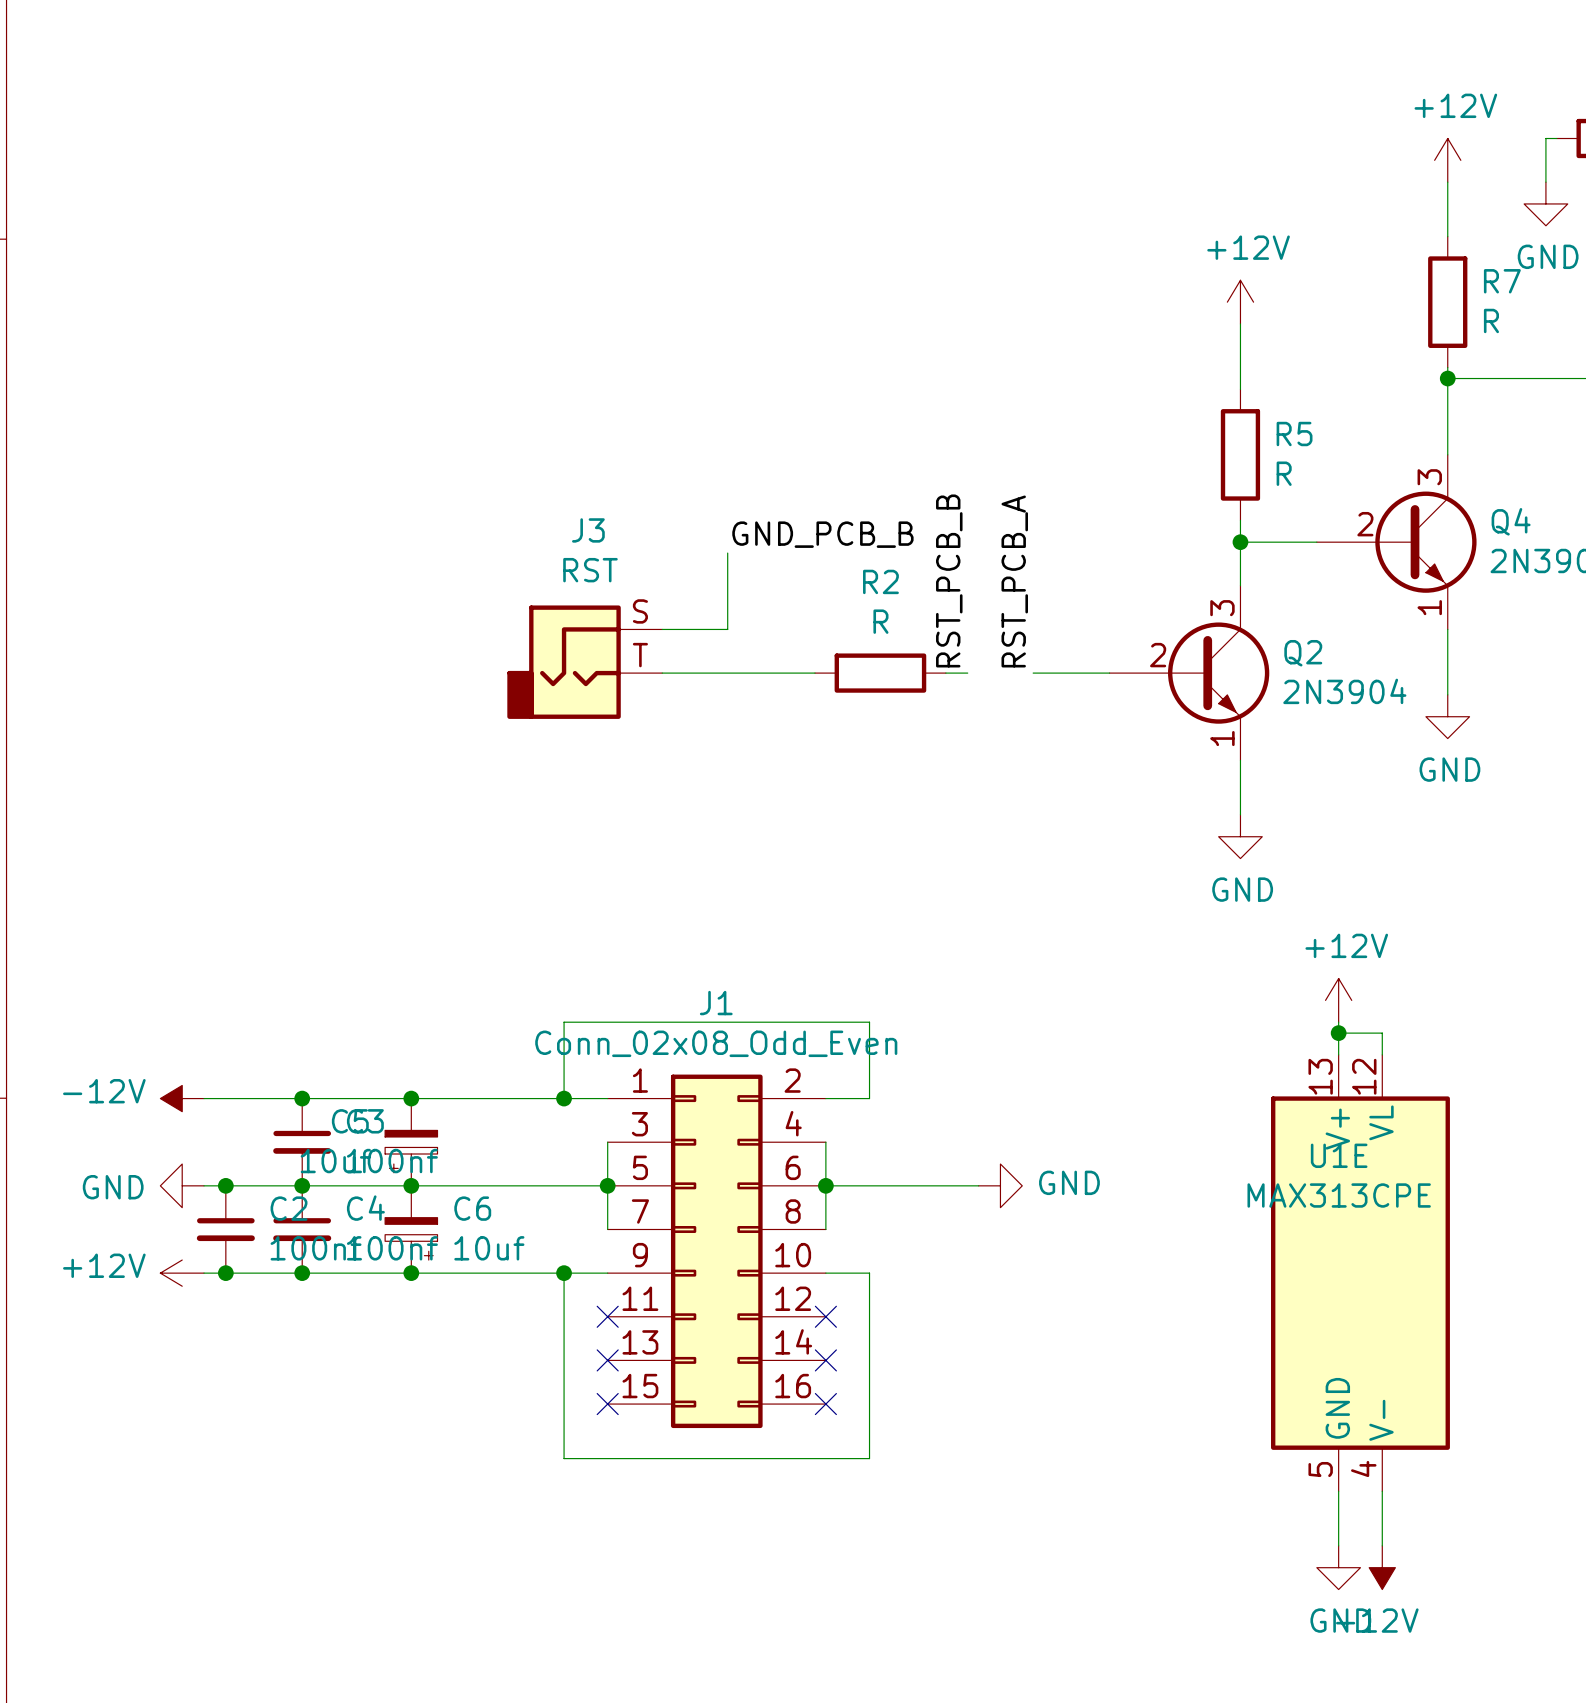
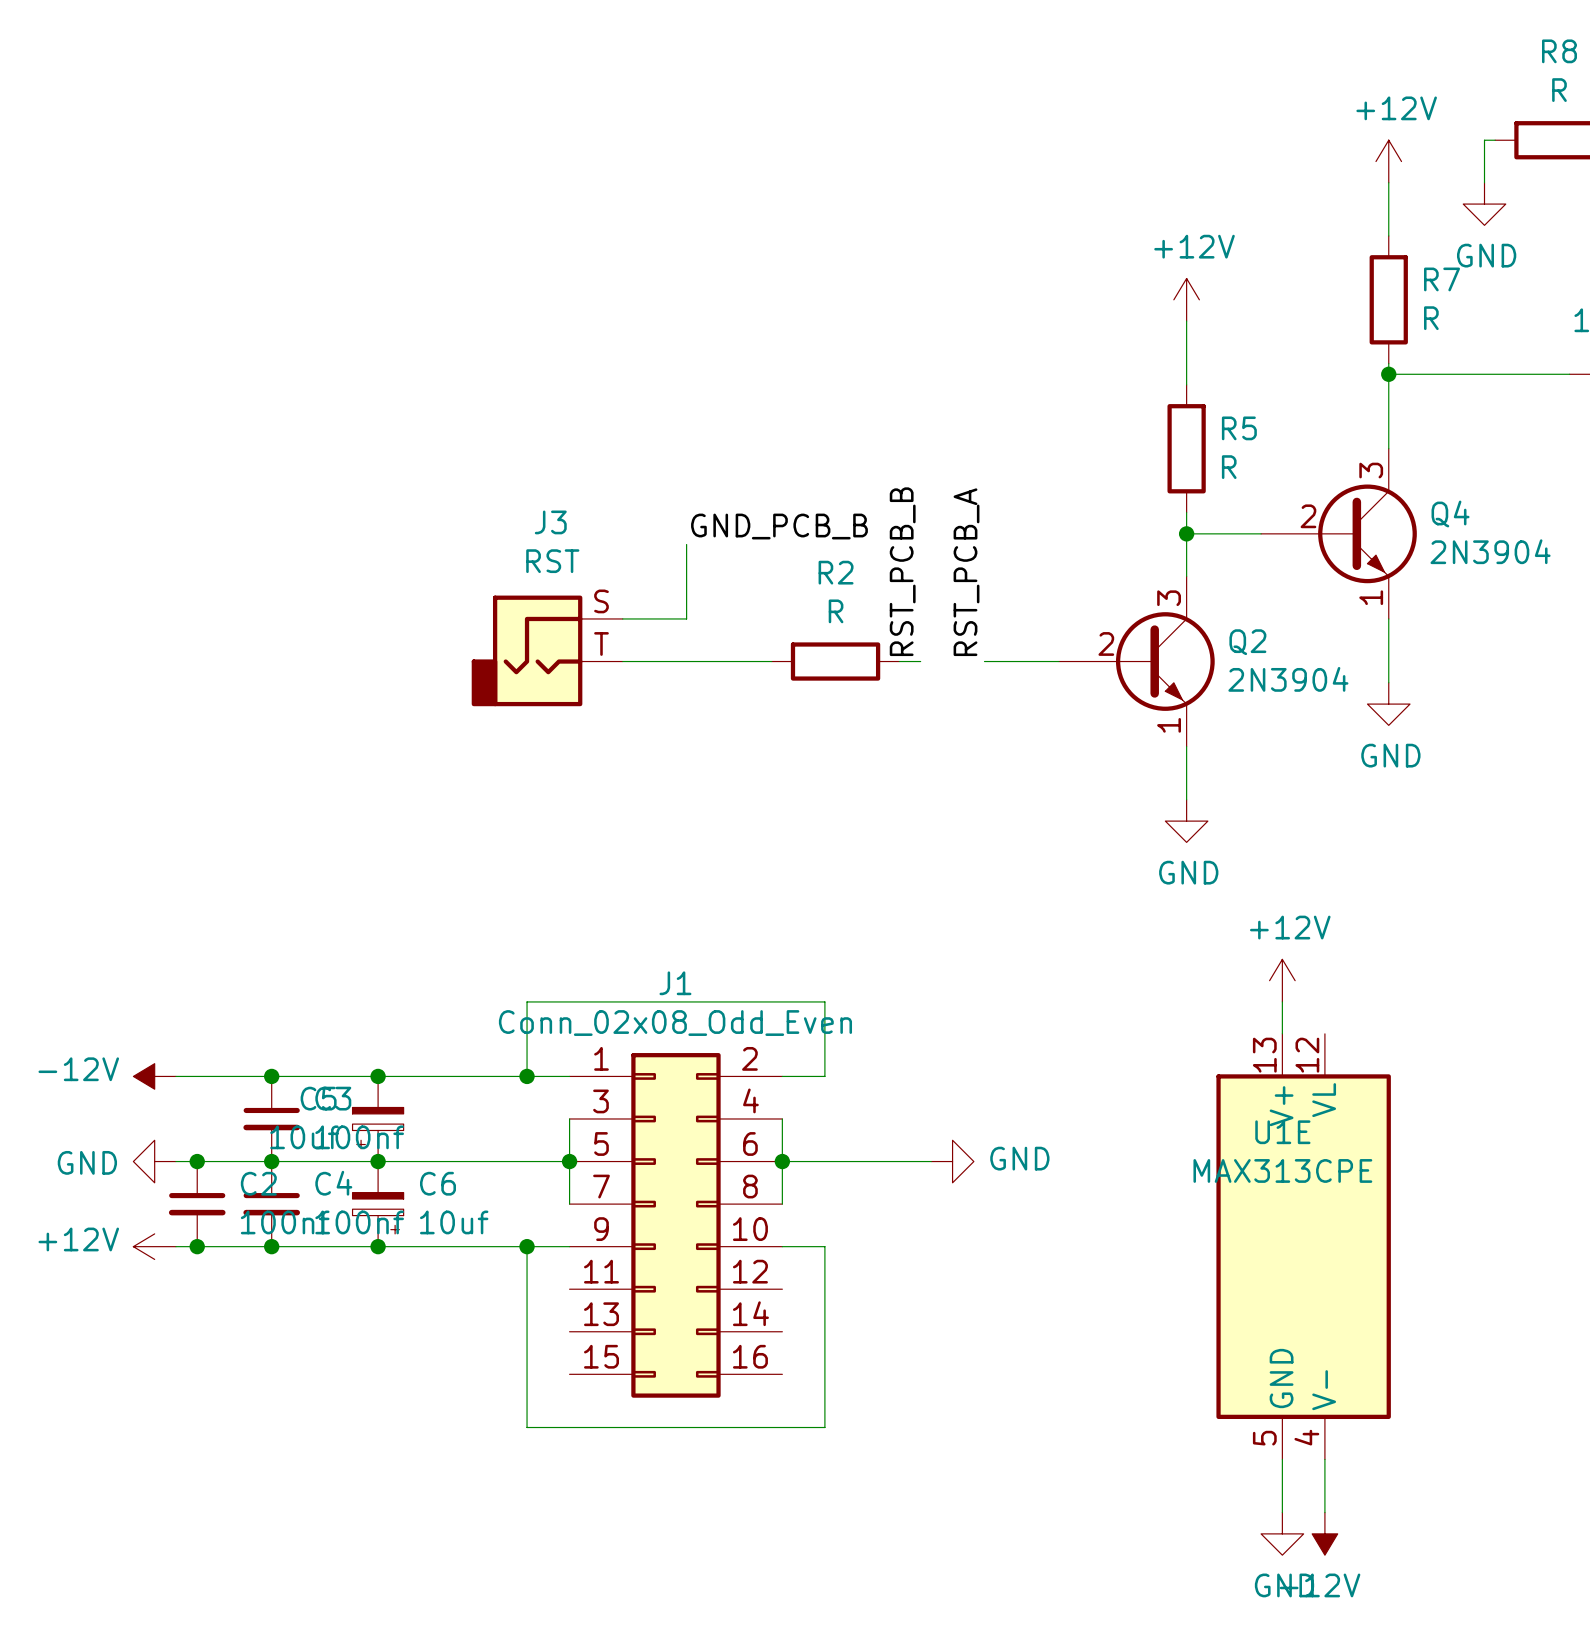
wire: (1338, 1033) (1382, 1033) (1382, 1054) -> none
junction: (1338, 1033) -> none
no-connect mark: (607, 1316) -> none
no-connect mark: (825, 1316) -> none
no-connect mark: (607, 1360) -> none
no-connect mark: (825, 1360) -> none
no-connect mark: (607, 1404) -> none
no-connect mark: (825, 1404) -> none

